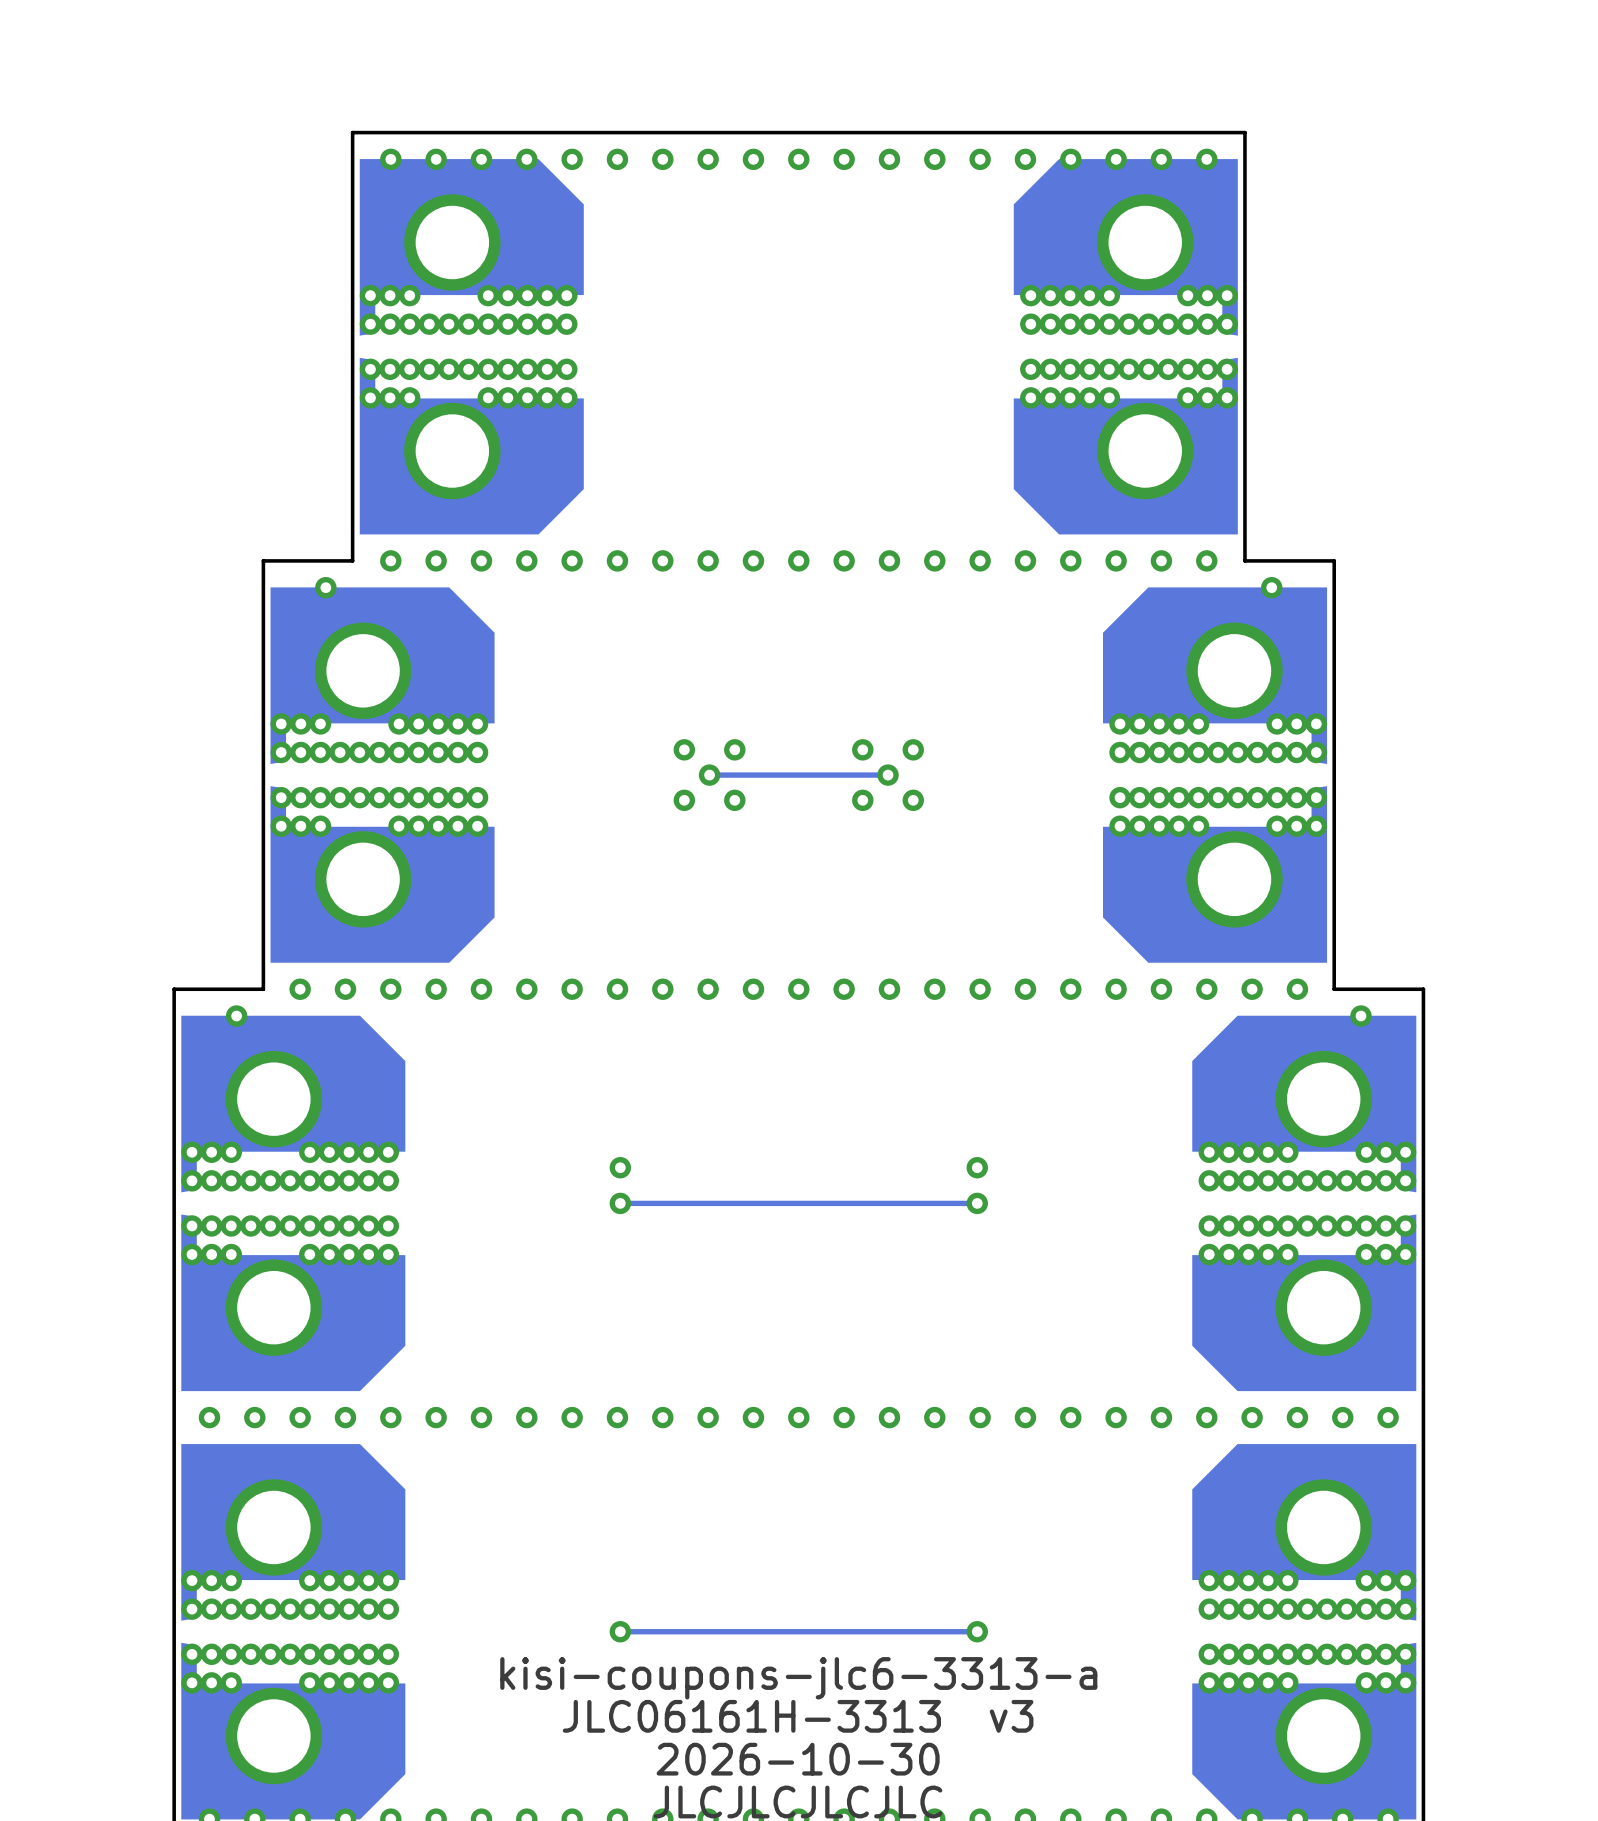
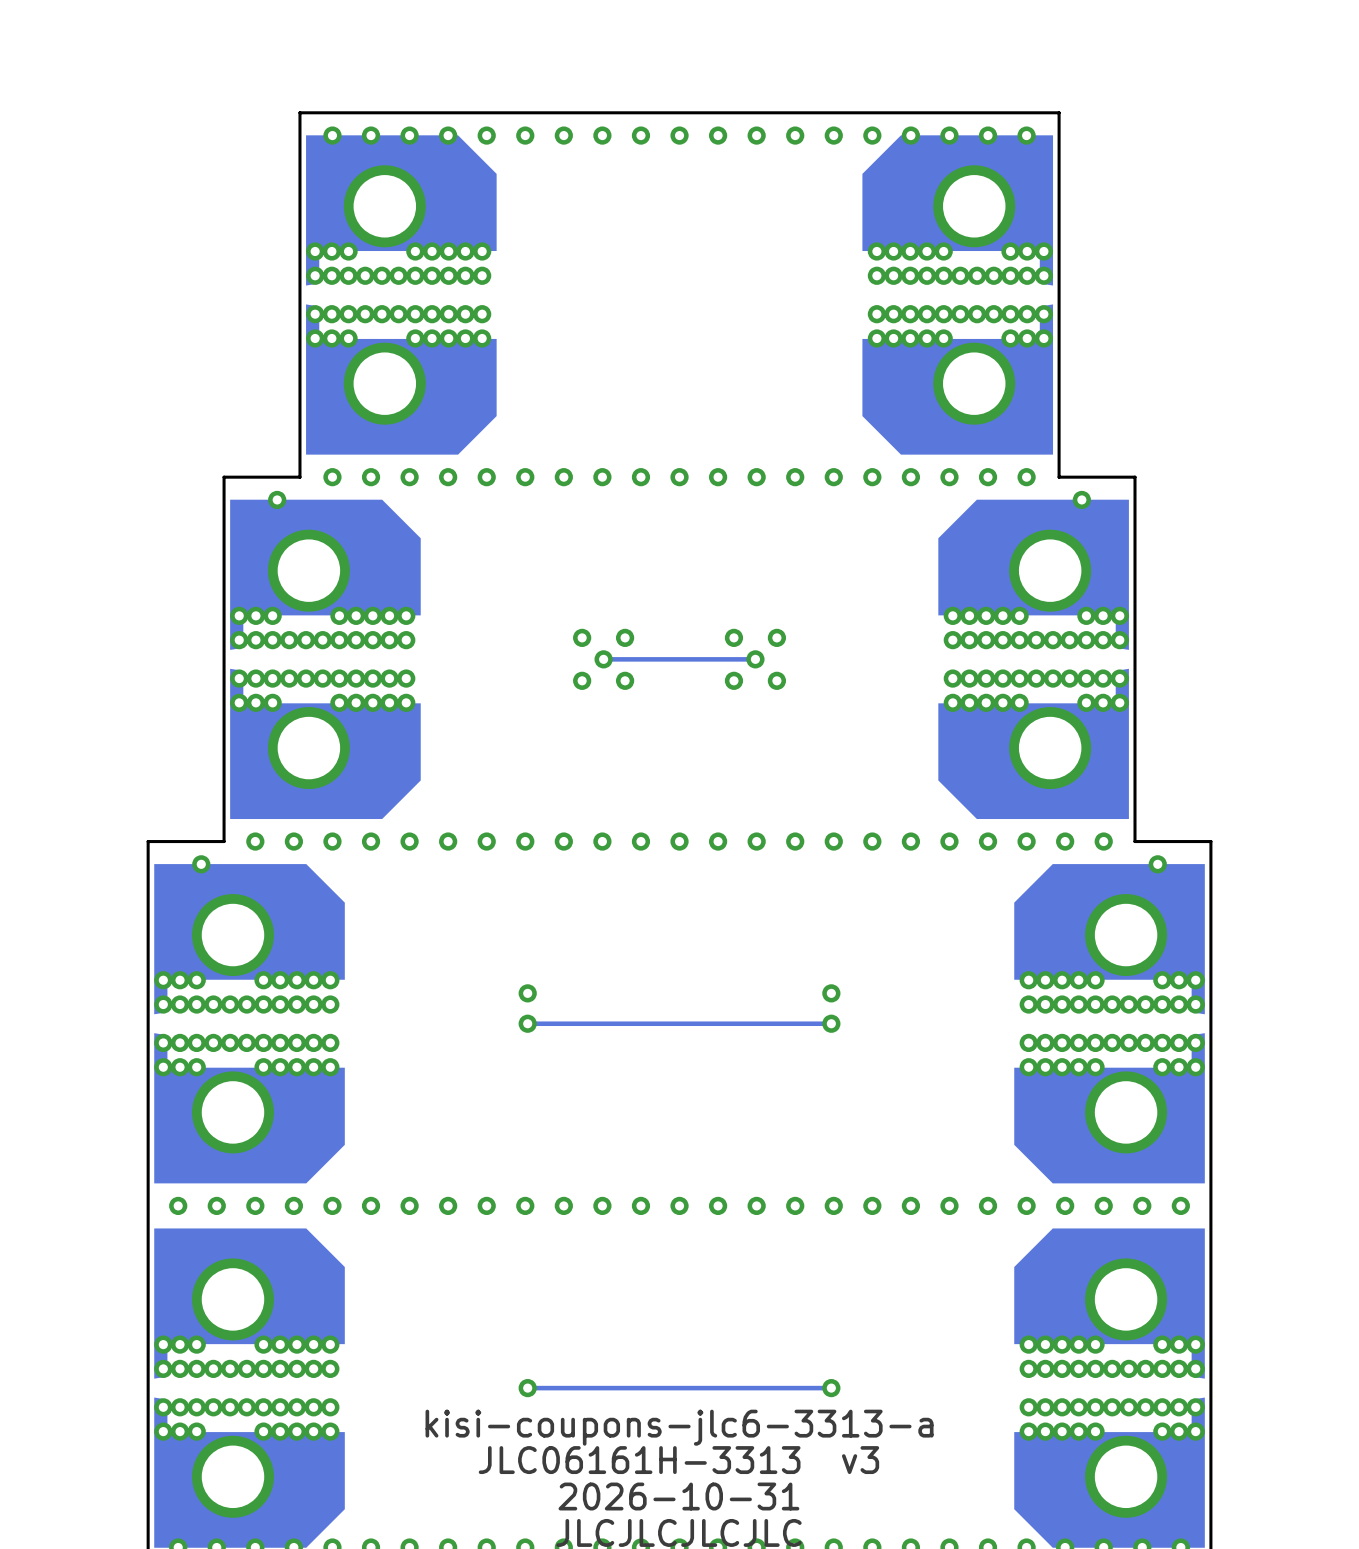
text: 2026-10-30 (798, 1759) -> 2026-10-31 (678, 1496)

